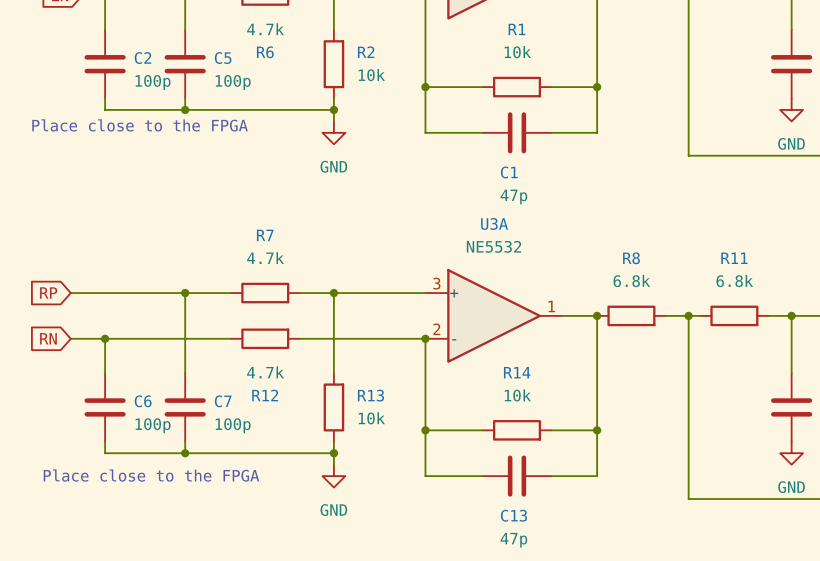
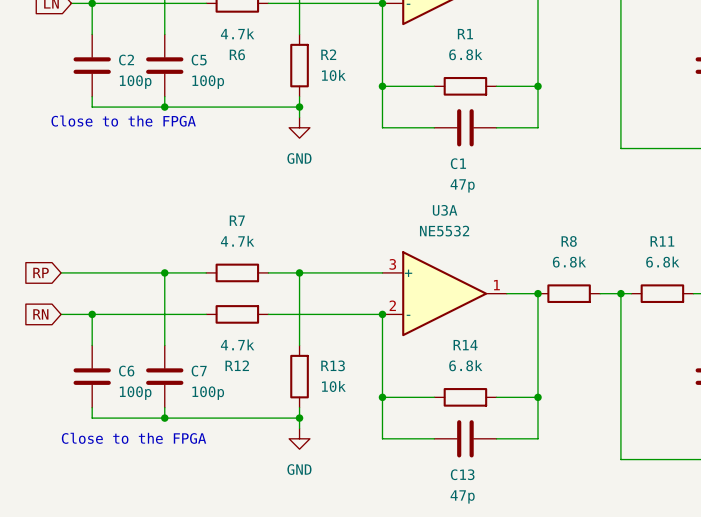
R1 value: 10k (517, 52) -> 6.8k (465, 54)
text: Place close to the FPGA (140, 125) -> Close to the FPGA (123, 121)
R14 value: 10k (517, 395) -> 6.8k (465, 365)
text: Place close to the FPGA (151, 475) -> Close to the FPGA (134, 438)

